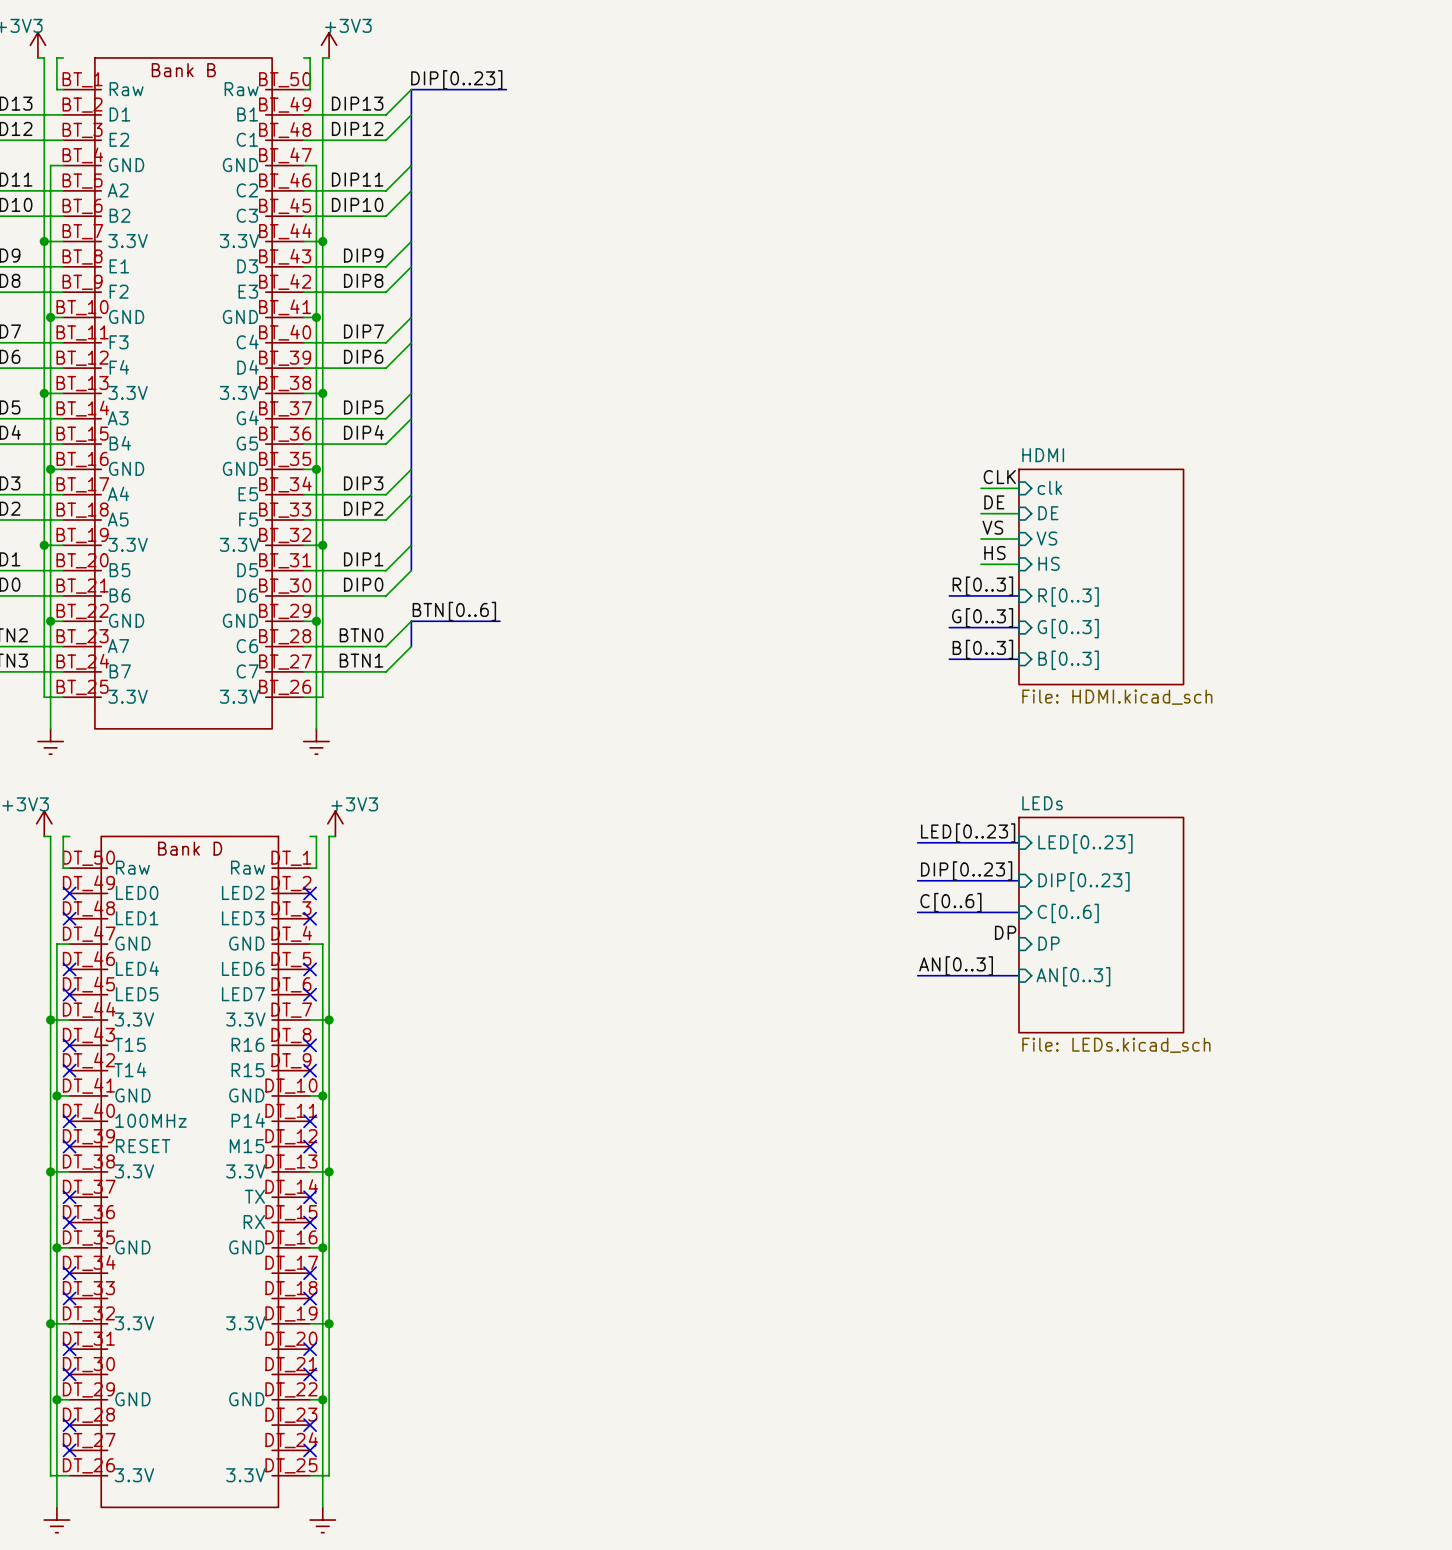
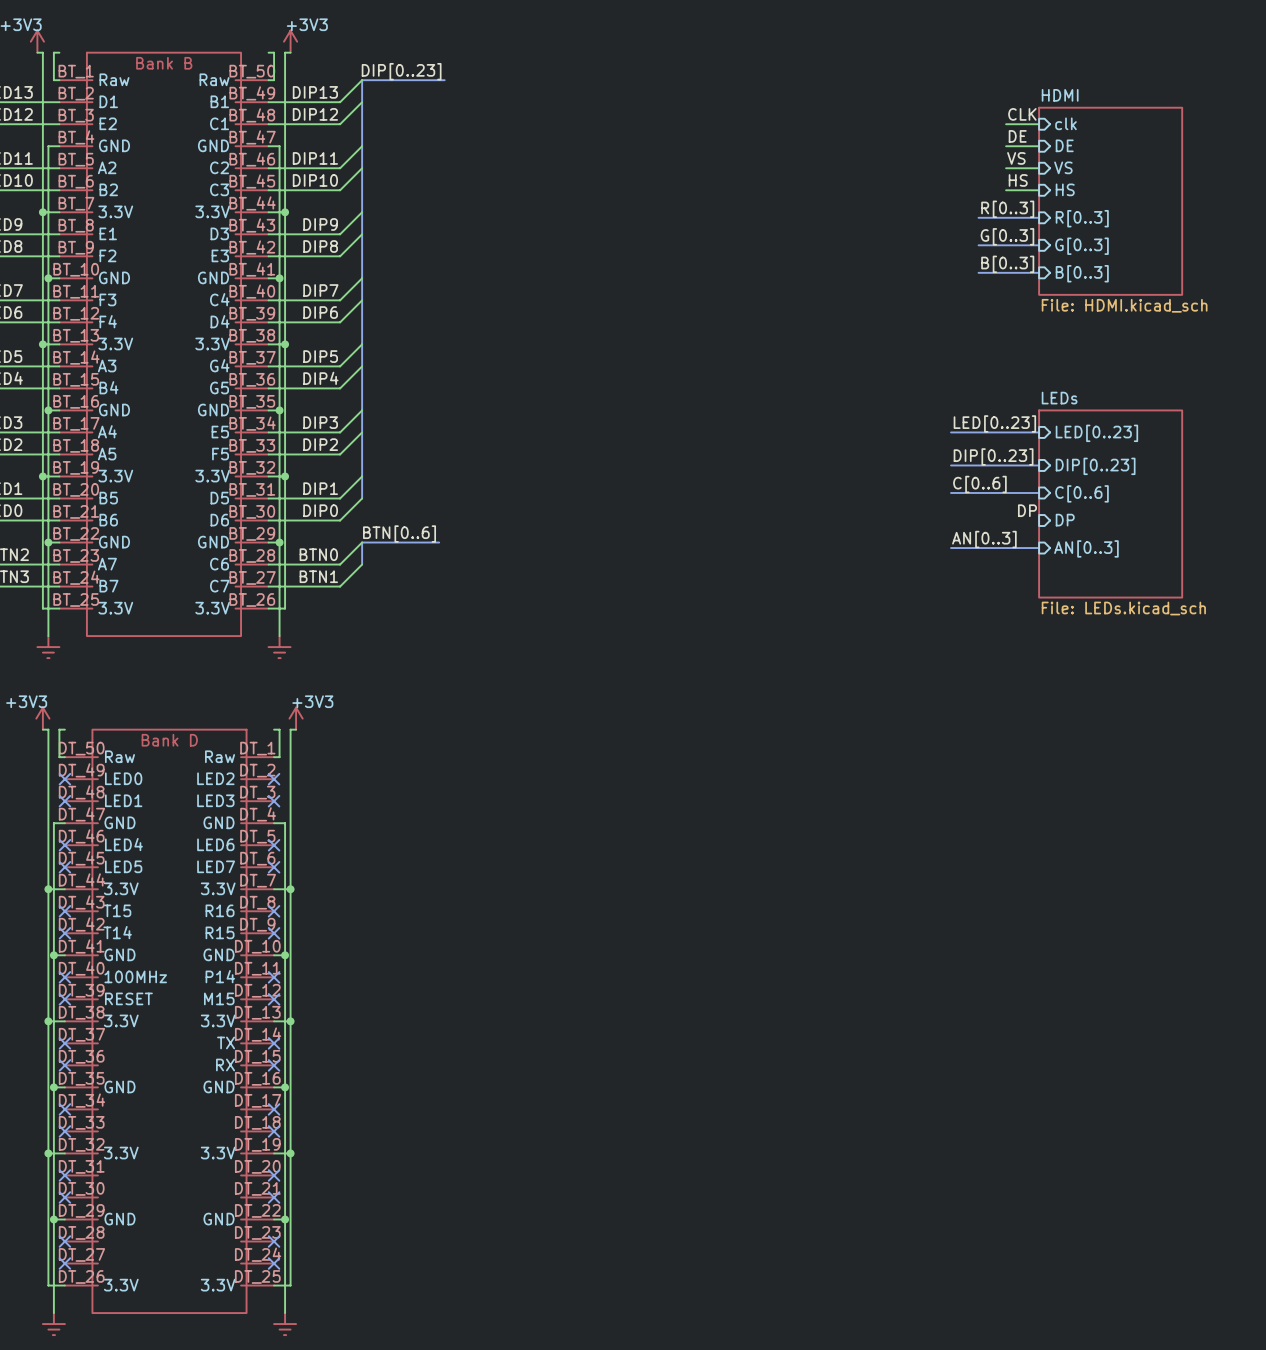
label: none -> CLK (1022, 114)
sheet pin: none -> clk (1065, 123)
wire: none -> (1006, 124) (1039, 124)
label: none -> DE (1017, 136)
wire: none -> (1006, 146) (1039, 146)
sheet pin: none -> DE (1064, 145)
label: none -> VS (1016, 158)
wire: none -> (1006, 168) (1039, 168)
sheet pin: none -> VS (1063, 167)
label: none -> HS (1018, 180)
sheet pin: none -> HS (1065, 189)
wire: none -> (1006, 190) (1039, 190)
sheet HDMI: none -> File: HDMI.kicad_sch (1110, 201)
label: none -> R[0..3] (1007, 209)
bus: none -> (978, 217) (1039, 217)
sheet pin: none -> R[0..3] (1082, 218)
label: none -> G[0..3] (1007, 236)
bus: none -> (978, 245) (1039, 245)
sheet pin: none -> G[0..3] (1081, 246)
label: none -> B[0..3] (1007, 264)
bus: none -> (978, 272) (1039, 272)
sheet pin: none -> B[0..3] (1082, 273)
label: CLK (999, 477) -> none
label: none -> LED[0..23] (994, 423)
sheet pin: clk (1049, 487) -> none
wire: (981, 488) (1018, 488) -> none
bus: none -> (951, 432) (1039, 432)
sheet pin: none -> LED[0..23] (1096, 433)
label: DE (994, 502) -> none
wire: (981, 513) (1018, 513) -> none
sheet pin: DE (1048, 513) -> none
label: none -> DIP[0..23] (993, 456)
label: VS (992, 527) -> none
bus: none -> (951, 465) (1039, 465)
sheet pin: none -> DIP[0..23] (1095, 466)
wire: (981, 538) (1018, 538) -> none
sheet pin: VS (1046, 538) -> none
label: HS (994, 553) -> none
label: none -> C[0..6] (979, 484)
sheet pin: HS (1049, 563) -> none
wire: (981, 564) (1018, 564) -> none
bus: none -> (951, 492) (1039, 492)
sheet pin: none -> C[0..6] (1081, 493)
sheet HDMI: File: HDMI.kicad_sch (1101, 576) -> none
sheet LEDs: none -> File: LEDs.kicad_sch (1110, 503)
label: none -> DP (1027, 510)
label: R[0..3] (982, 586) -> none
bus: (949, 595) (1018, 595) -> none
sheet pin: none -> DP (1065, 520)
sheet pin: R[0..3] (1068, 596) -> none
label: G[0..3] (982, 617) -> none
label: none -> AN[0..3] (984, 539)
bus: (949, 627) (1018, 627) -> none
bus: none -> (951, 548) (1039, 548)
sheet pin: G[0..3] (1068, 628) -> none
sheet pin: none -> AN[0..3] (1086, 548)
label: B[0..3] (982, 649) -> none
bus: (949, 659) (1018, 659) -> none
sheet pin: B[0..3] (1068, 660) -> none
label: LED[0..23] (968, 833) -> none
bus: (917, 842) (1018, 842) -> none
sheet pin: LED[0..23] (1085, 843) -> none
label: DIP[0..23] (966, 870) -> none
bus: (917, 880) (1018, 880) -> none
sheet pin: DIP[0..23] (1083, 881) -> none
label: C[0..6] (950, 902) -> none
bus: (917, 912) (1018, 912) -> none
sheet pin: C[0..6] (1068, 913) -> none
sheet LEDs: File: LEDs.kicad_sch (1101, 925) -> none
label: DP (1005, 932) -> none
sheet pin: DP (1049, 943) -> none
label: AN[0..3] (956, 965) -> none
bus: (917, 975) (1018, 975) -> none
sheet pin: AN[0..3] (1073, 976) -> none

